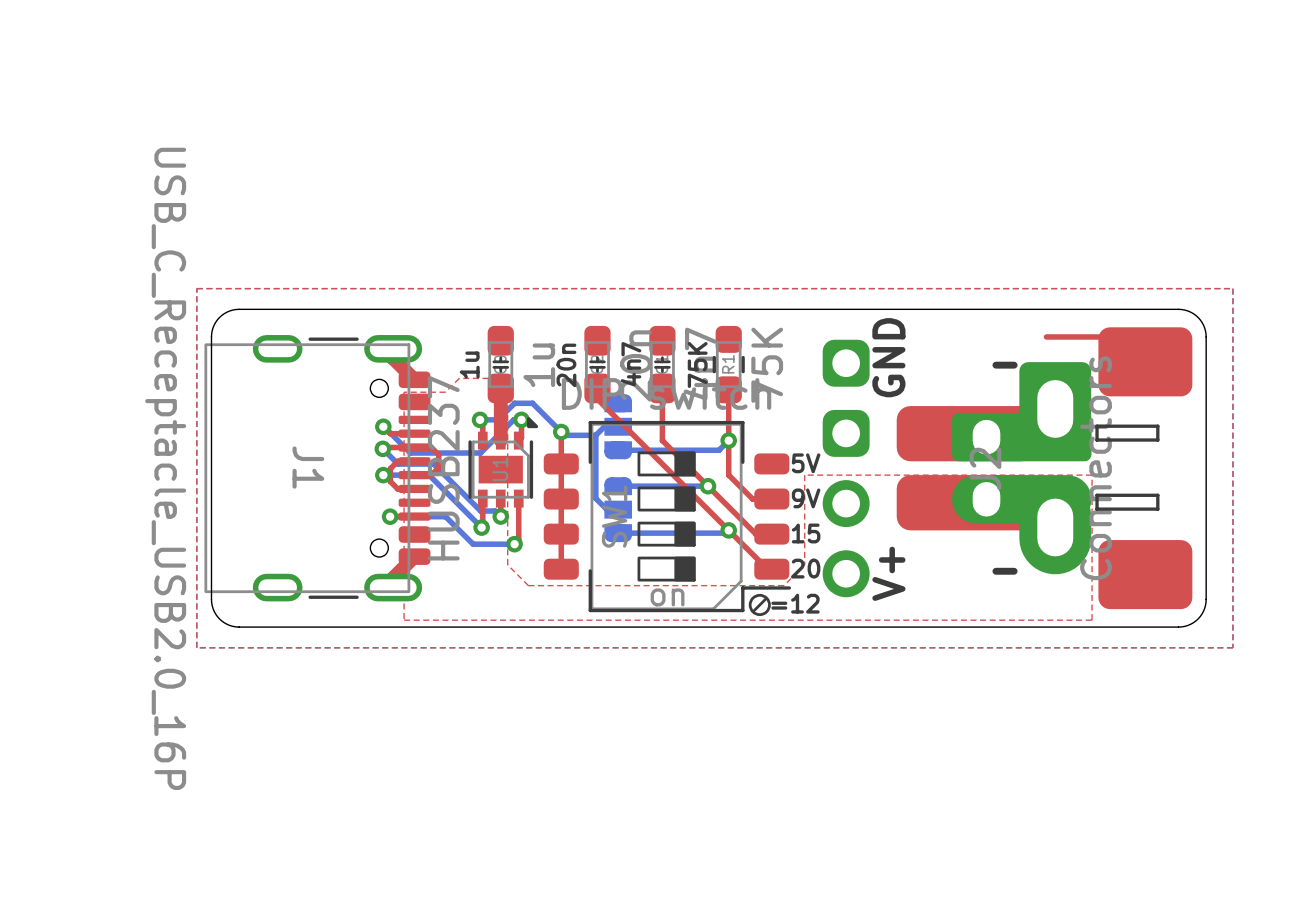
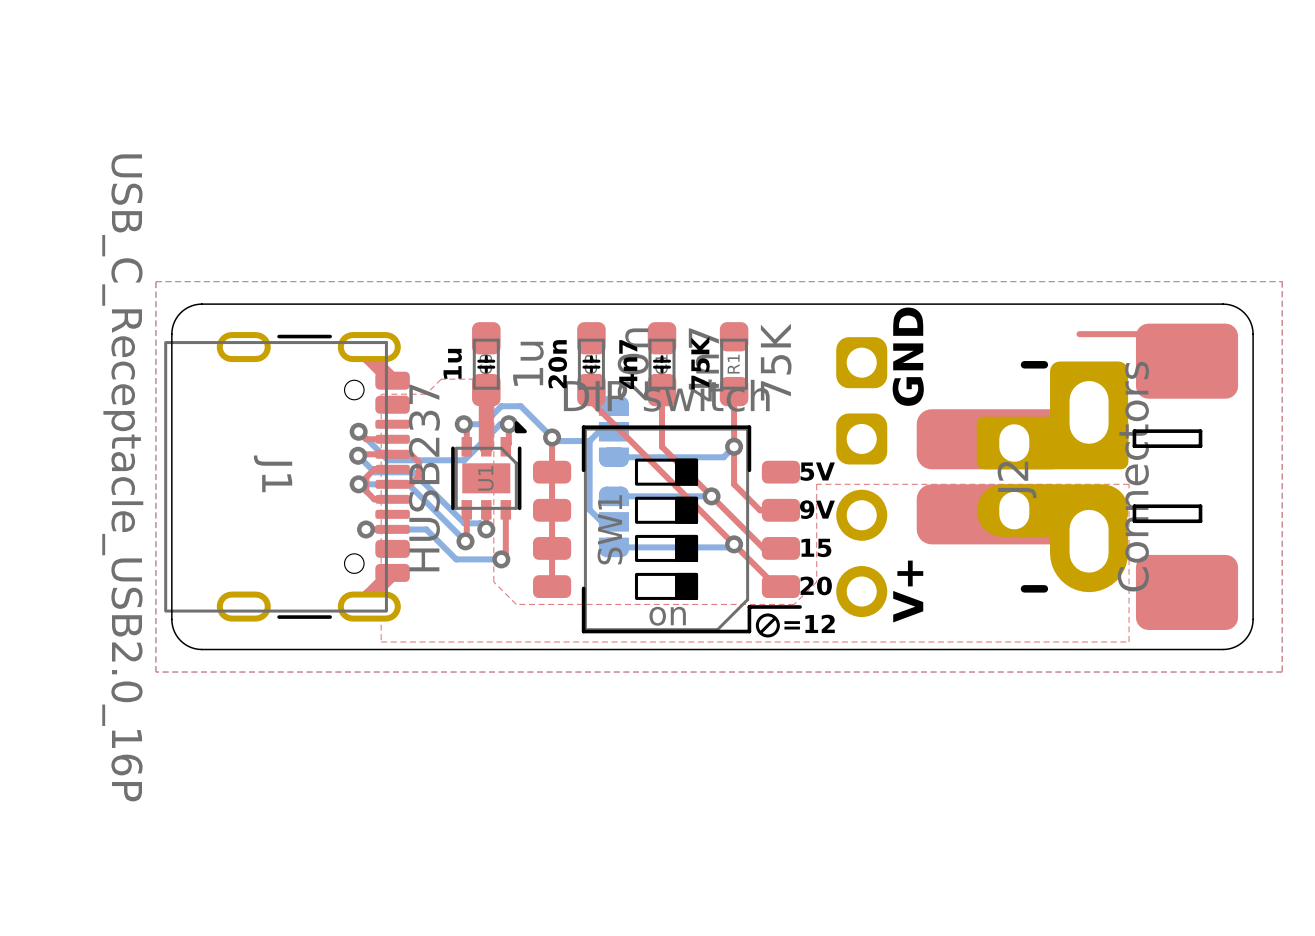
R1 footprint: [712, 325, 745, 404] -> [719, 322, 749, 407]

